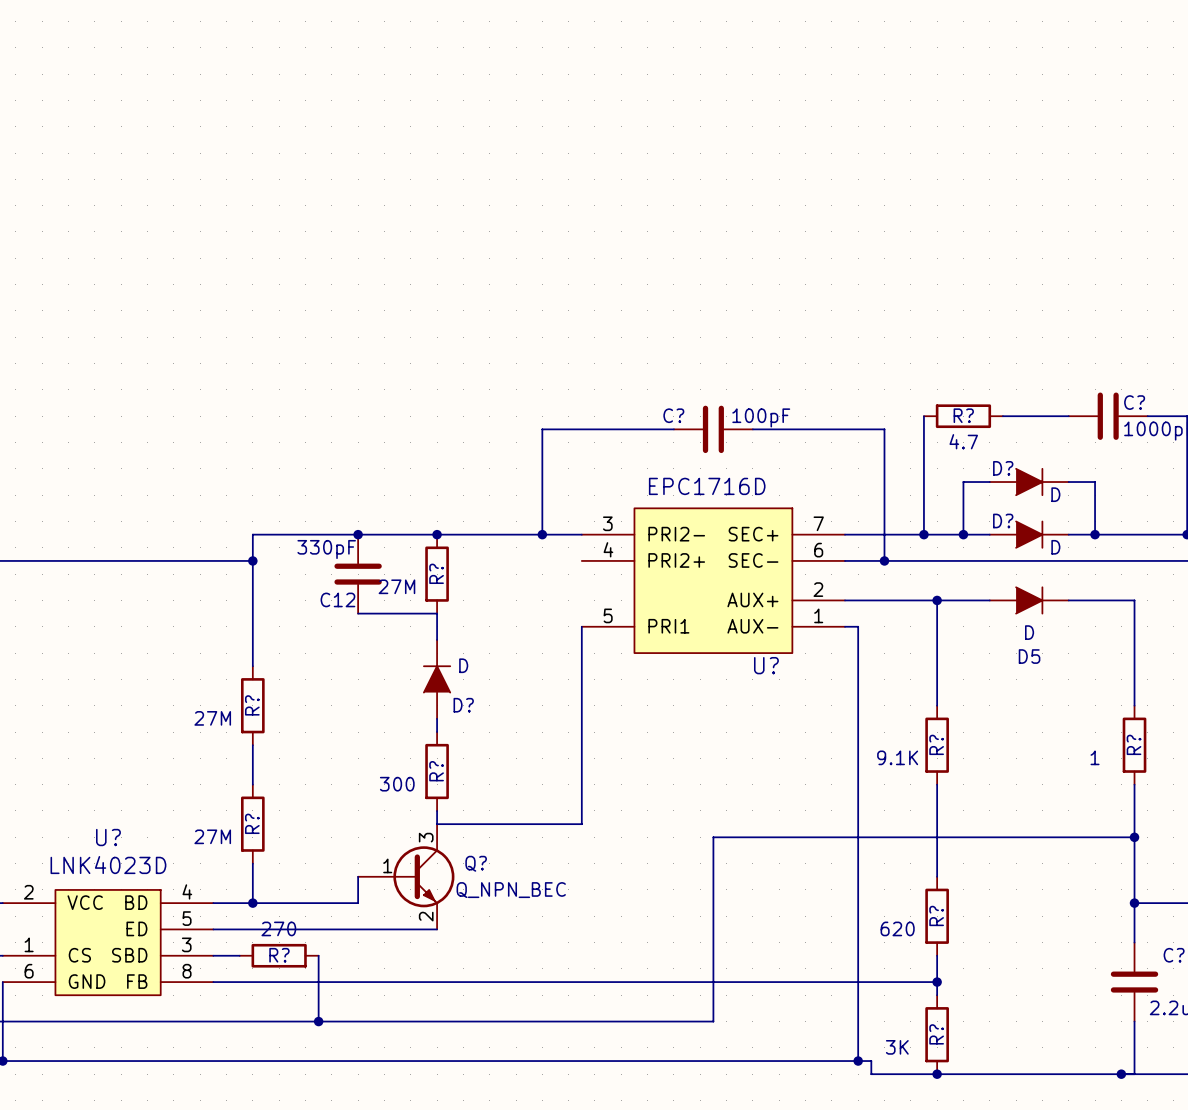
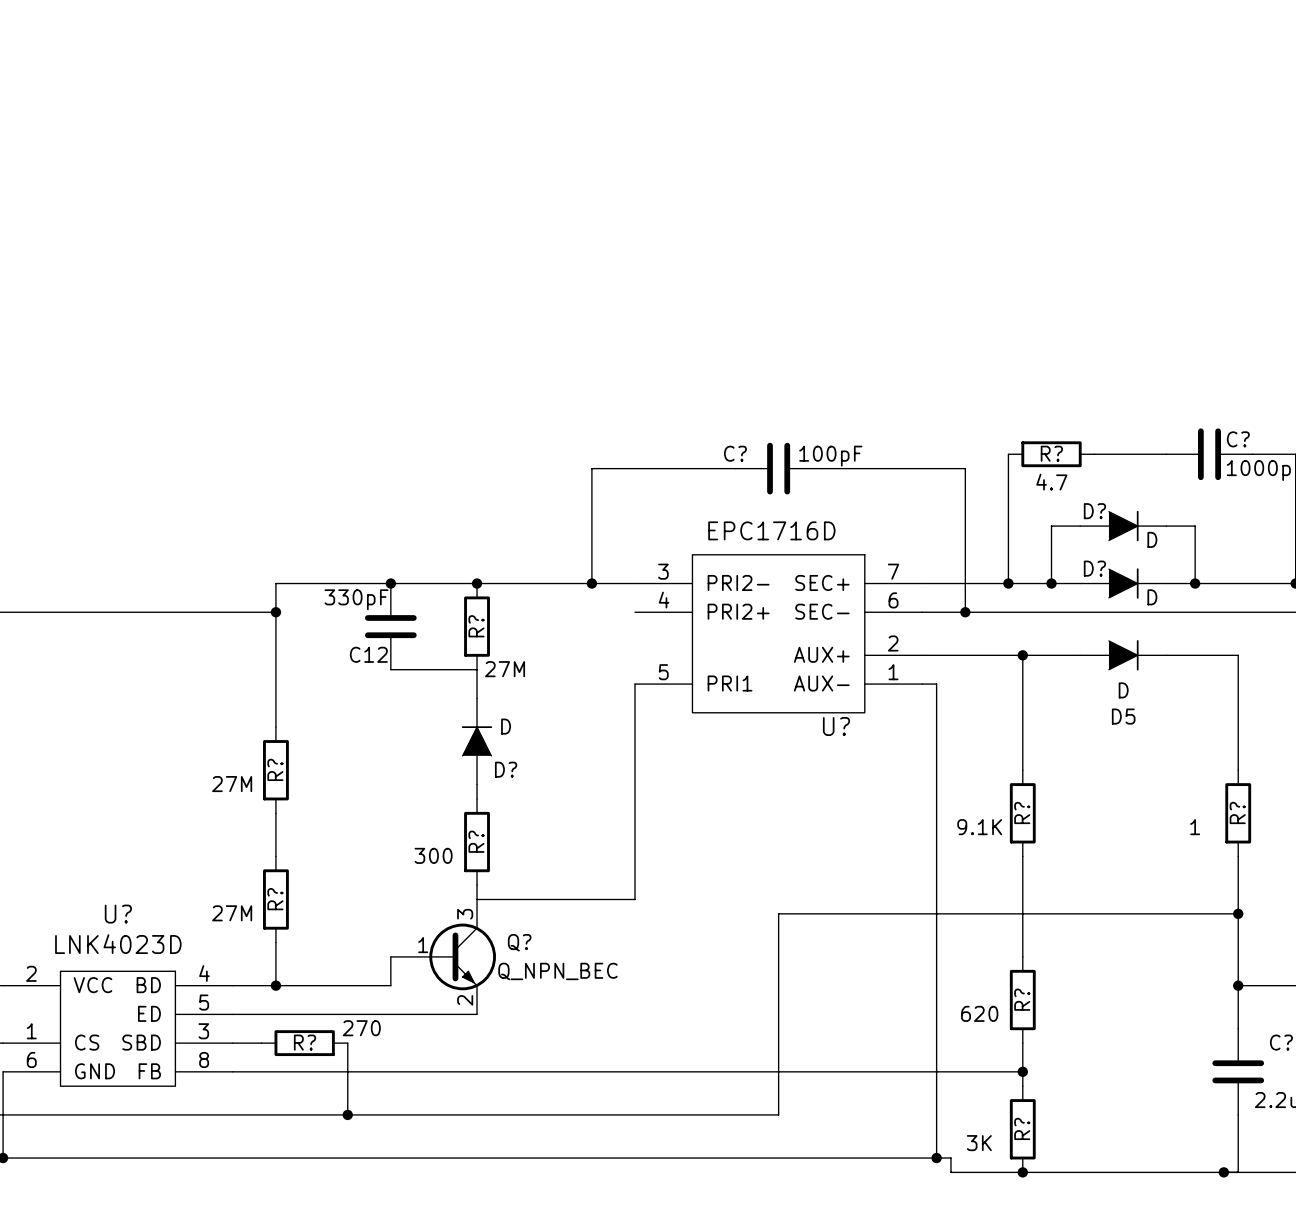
R? value position: 27M (396, 586) -> 27M (505, 669)
R? value position: 270 (278, 928) -> 270 (361, 1028)

